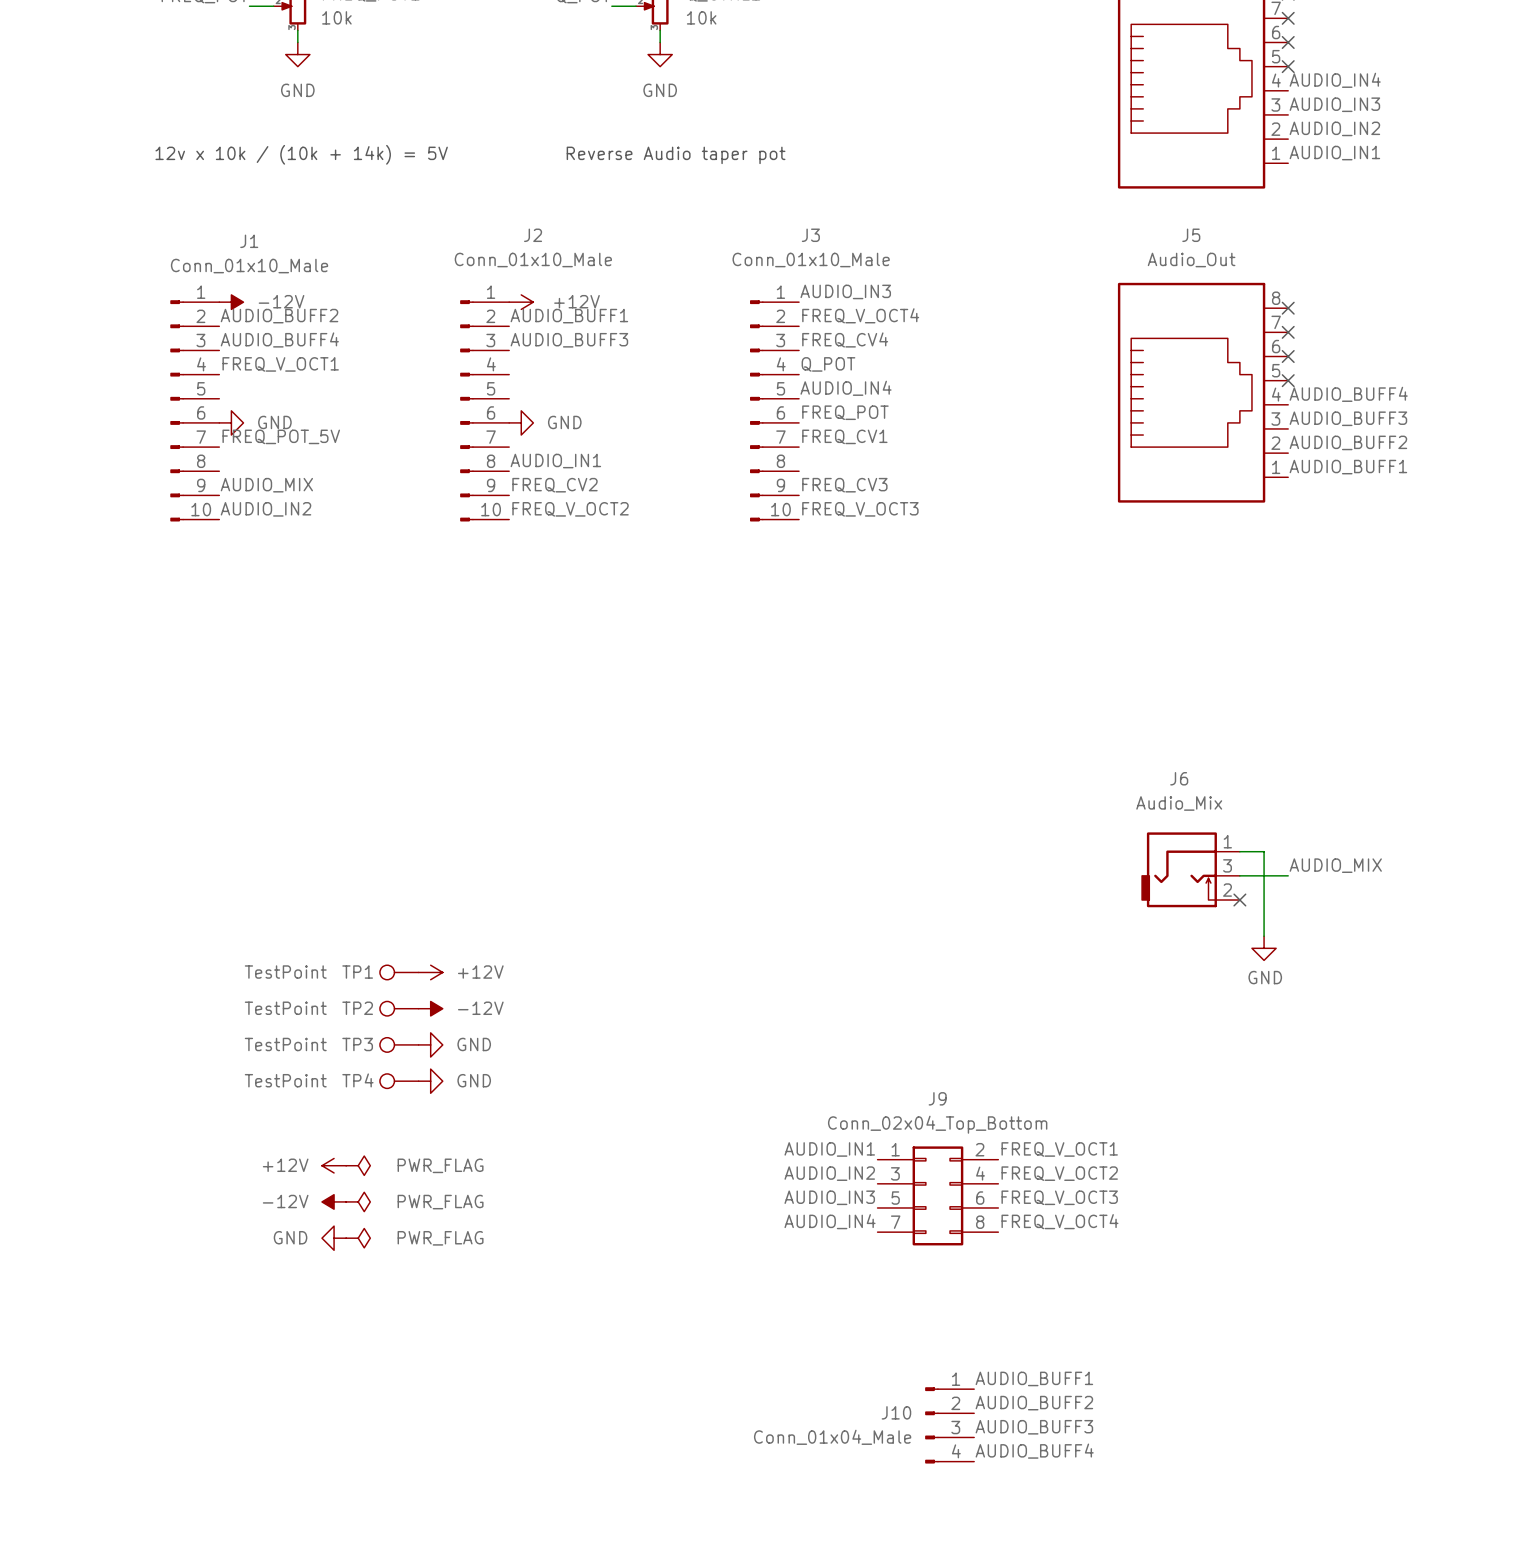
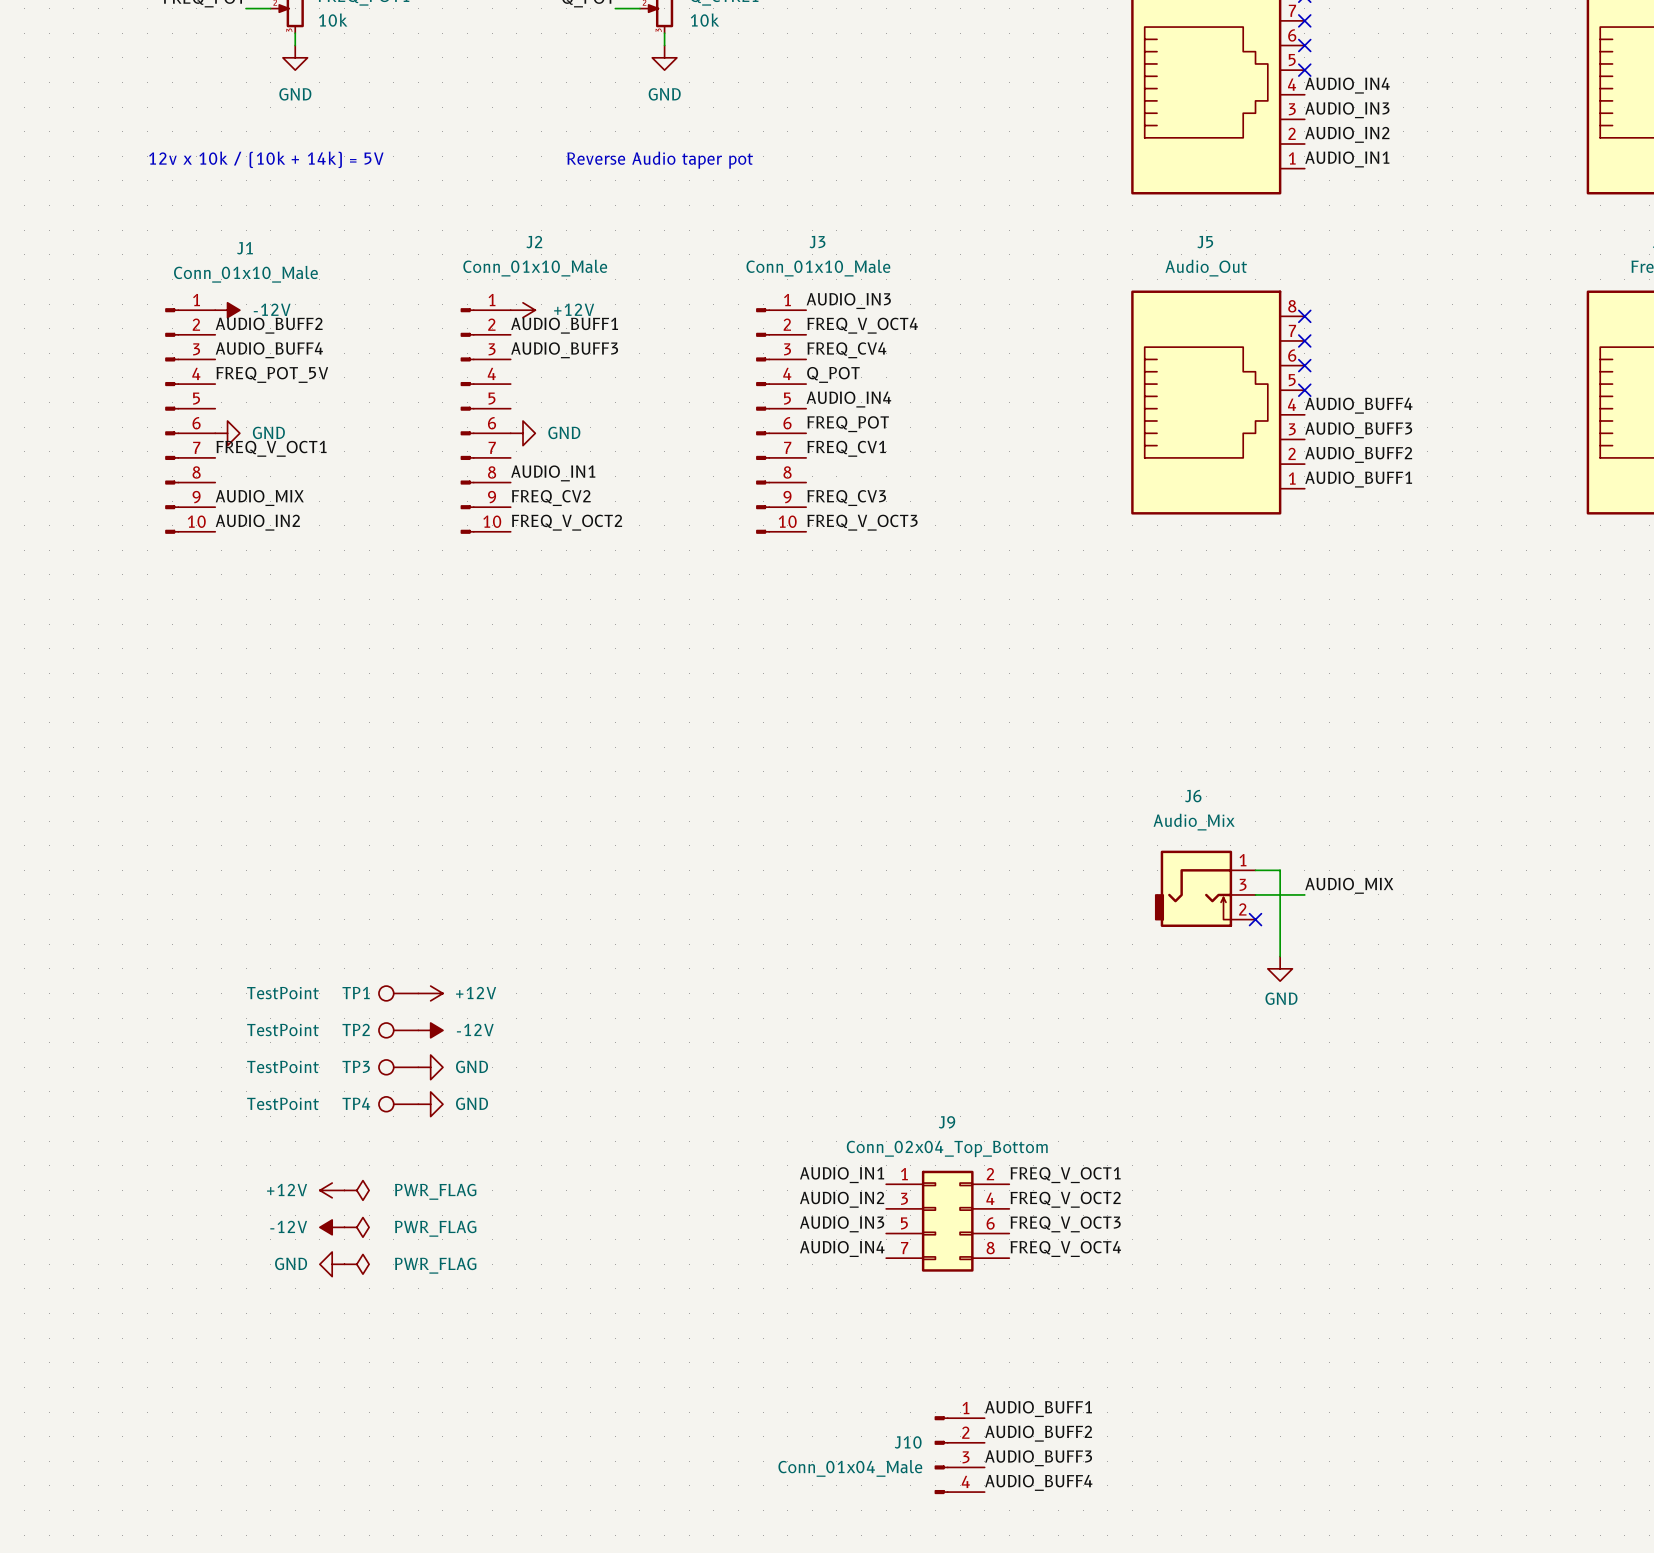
label: FREQ_V_OCT1 (280, 364) -> FREQ_POT_5V (272, 374)
label: FREQ_POT_5V (281, 436) -> FREQ_V_OCT1 (271, 448)

